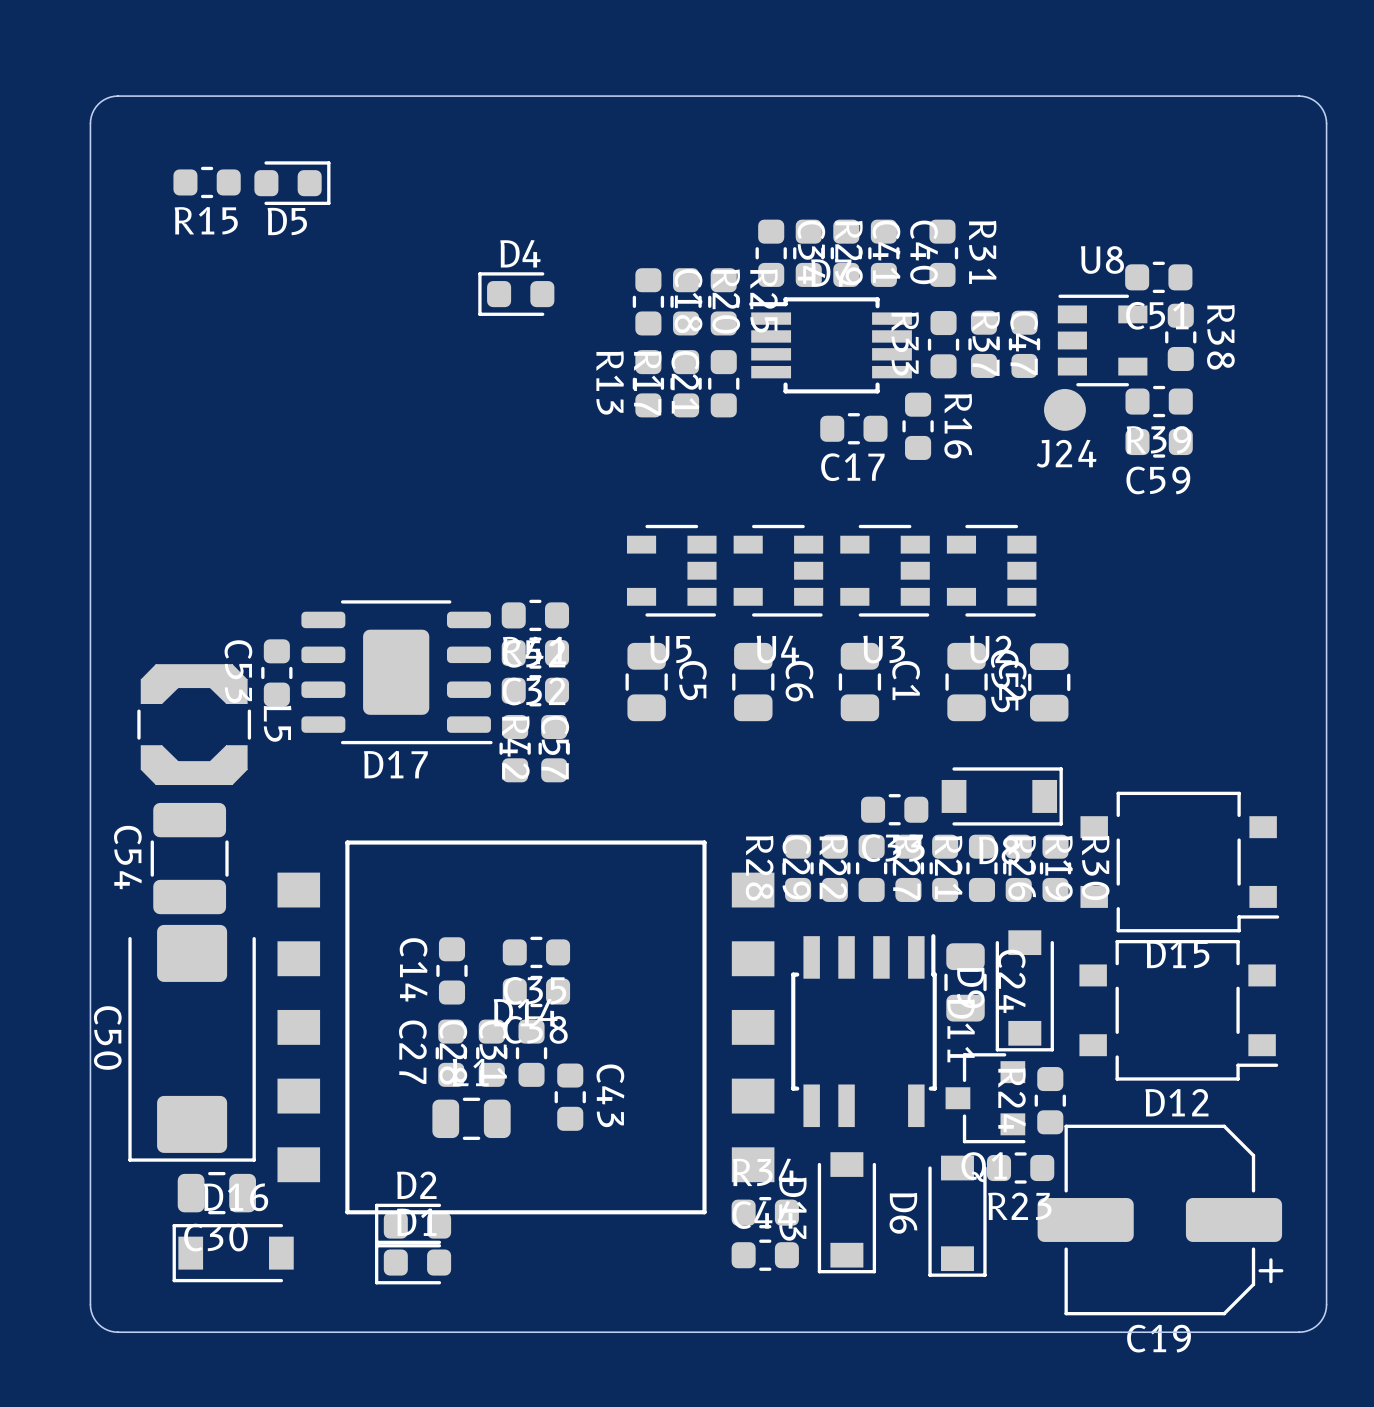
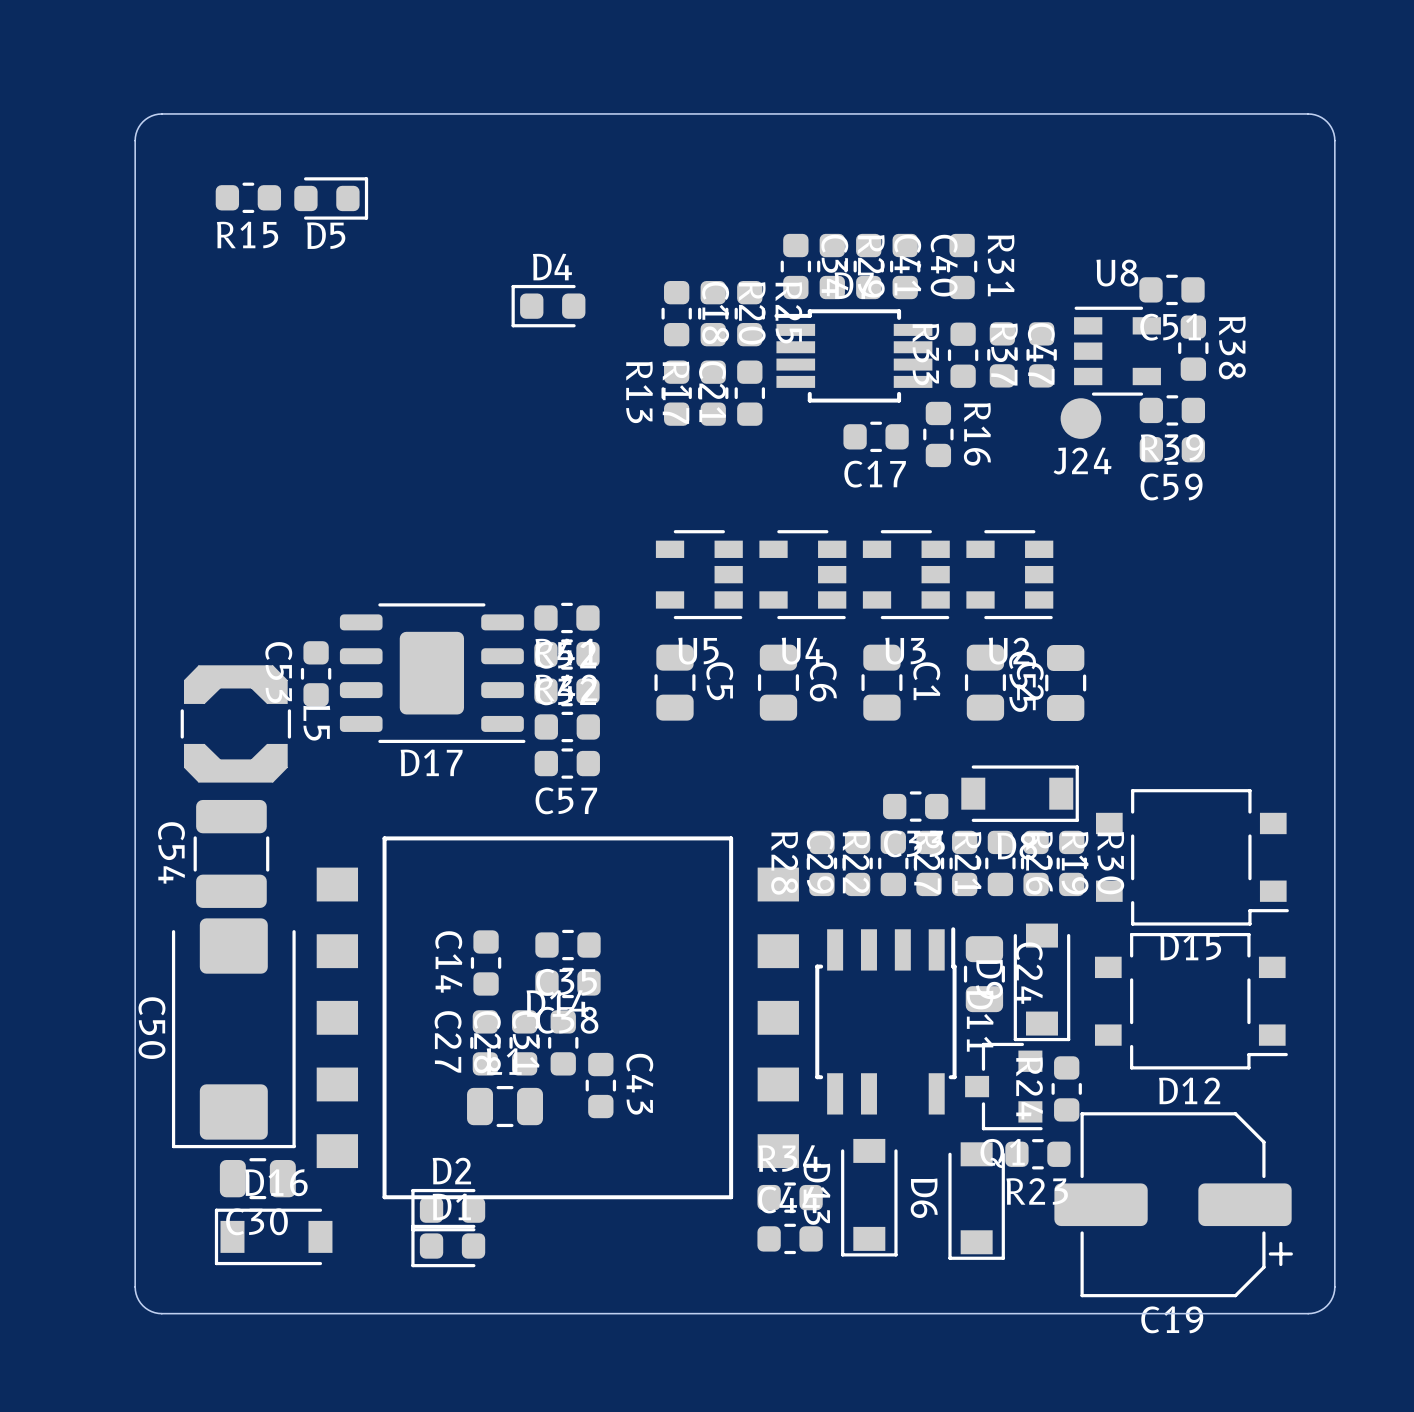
C57 rotation: 0° (515, 748) -> 90° clockwise (567, 763)
part rotation: 0° (554, 748) -> 90° clockwise (567, 726)

